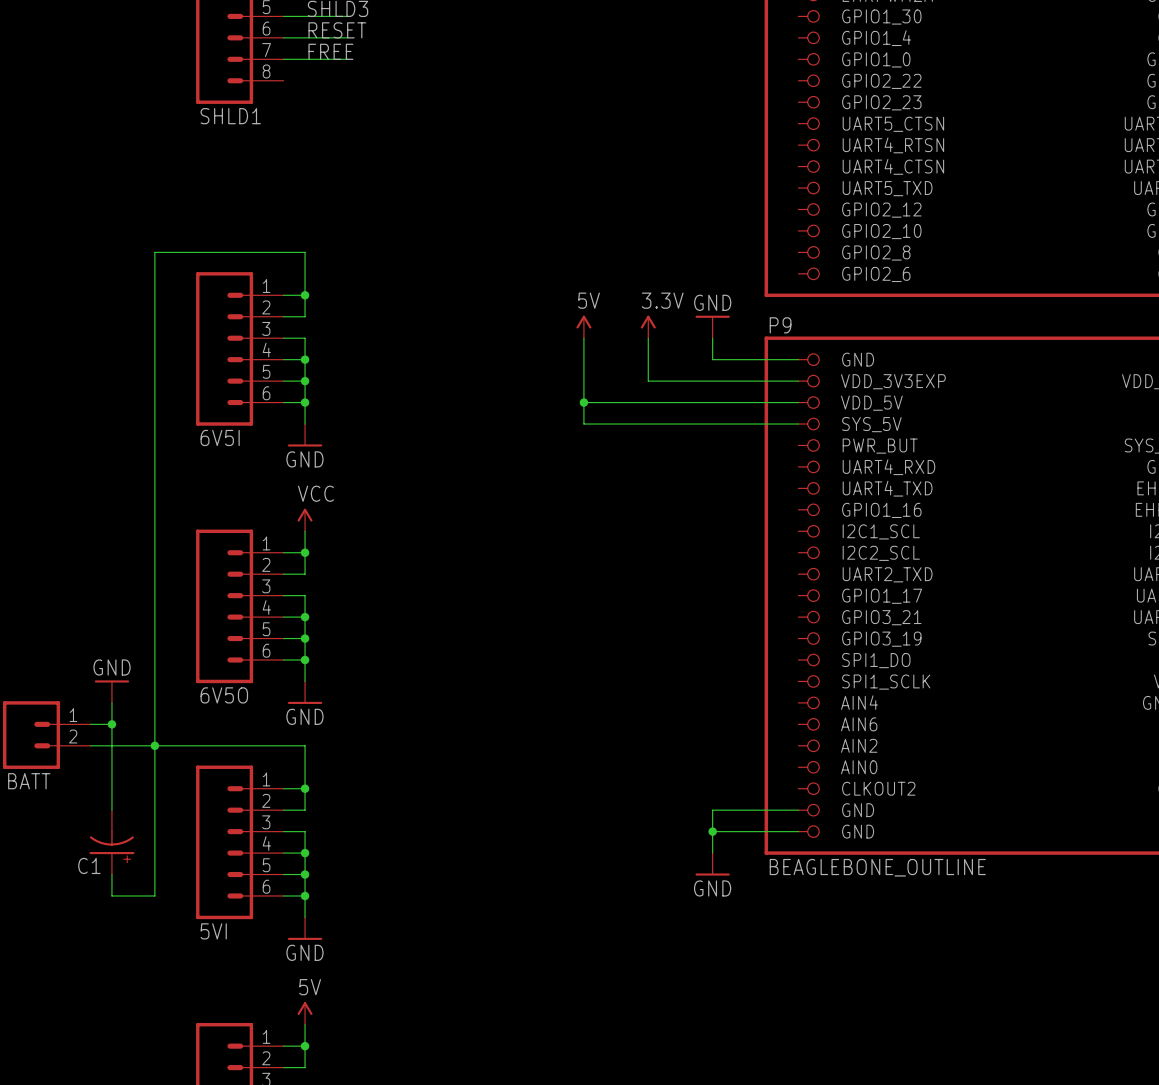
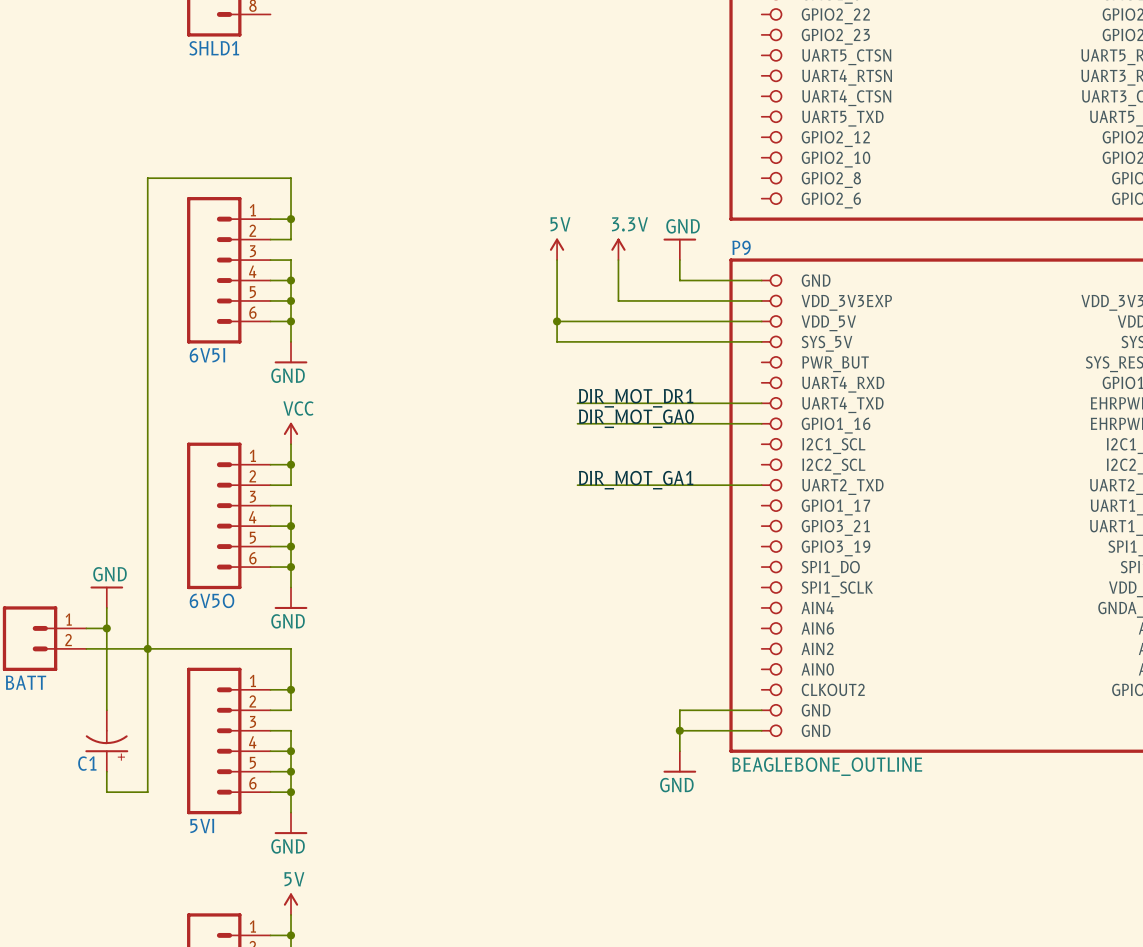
label: none -> DIR_MOT_DR1 (636, 398)
wire: none -> (577, 403) (761, 403)
label: none -> DIR_MOT_GA0 (636, 418)
wire: none -> (577, 423) (761, 423)
label: none -> DIR_MOT_GA1 (636, 480)
wire: none -> (577, 485) (761, 485)

